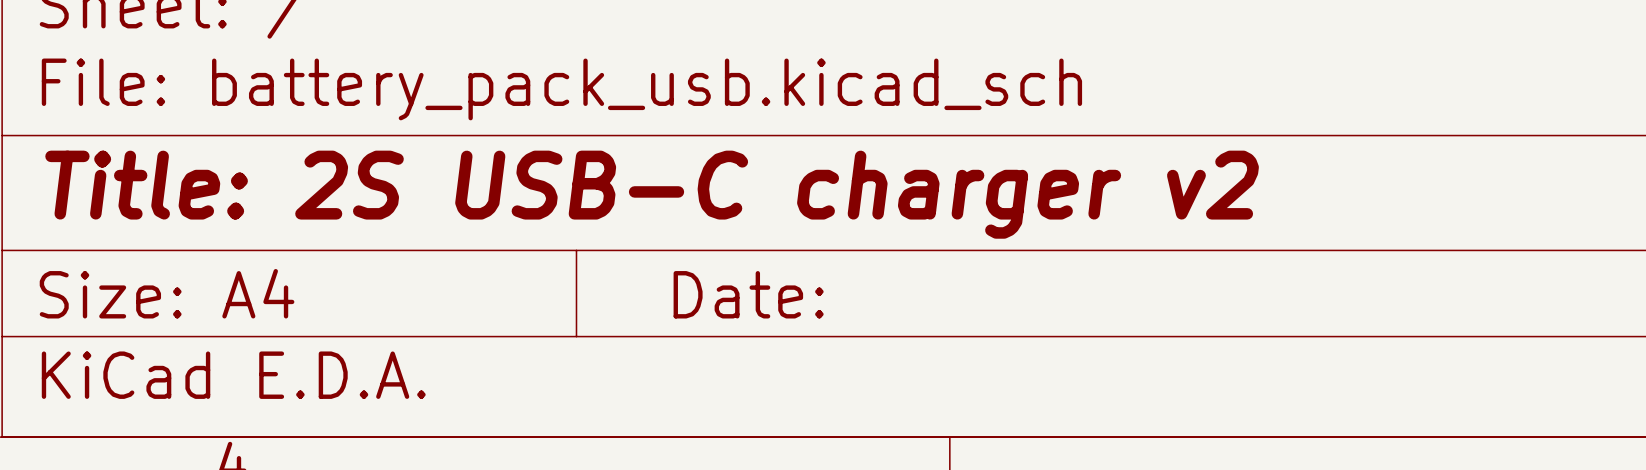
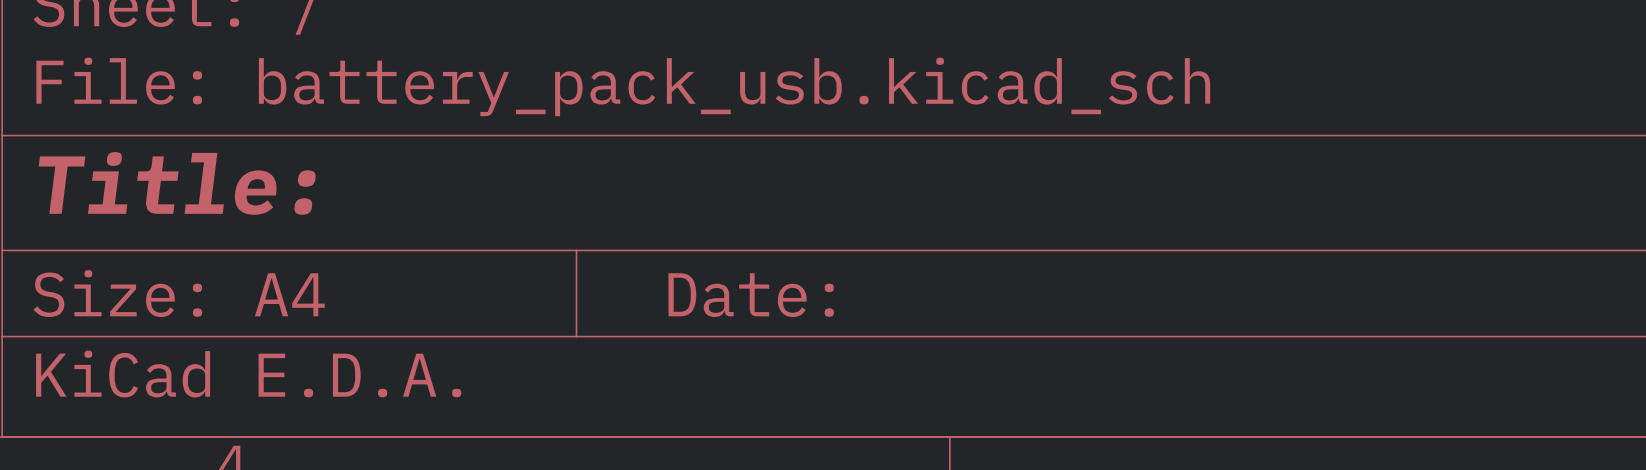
title block: Title: 2S USB-C charger v2 (652, 194) -> Title: (177, 183)

